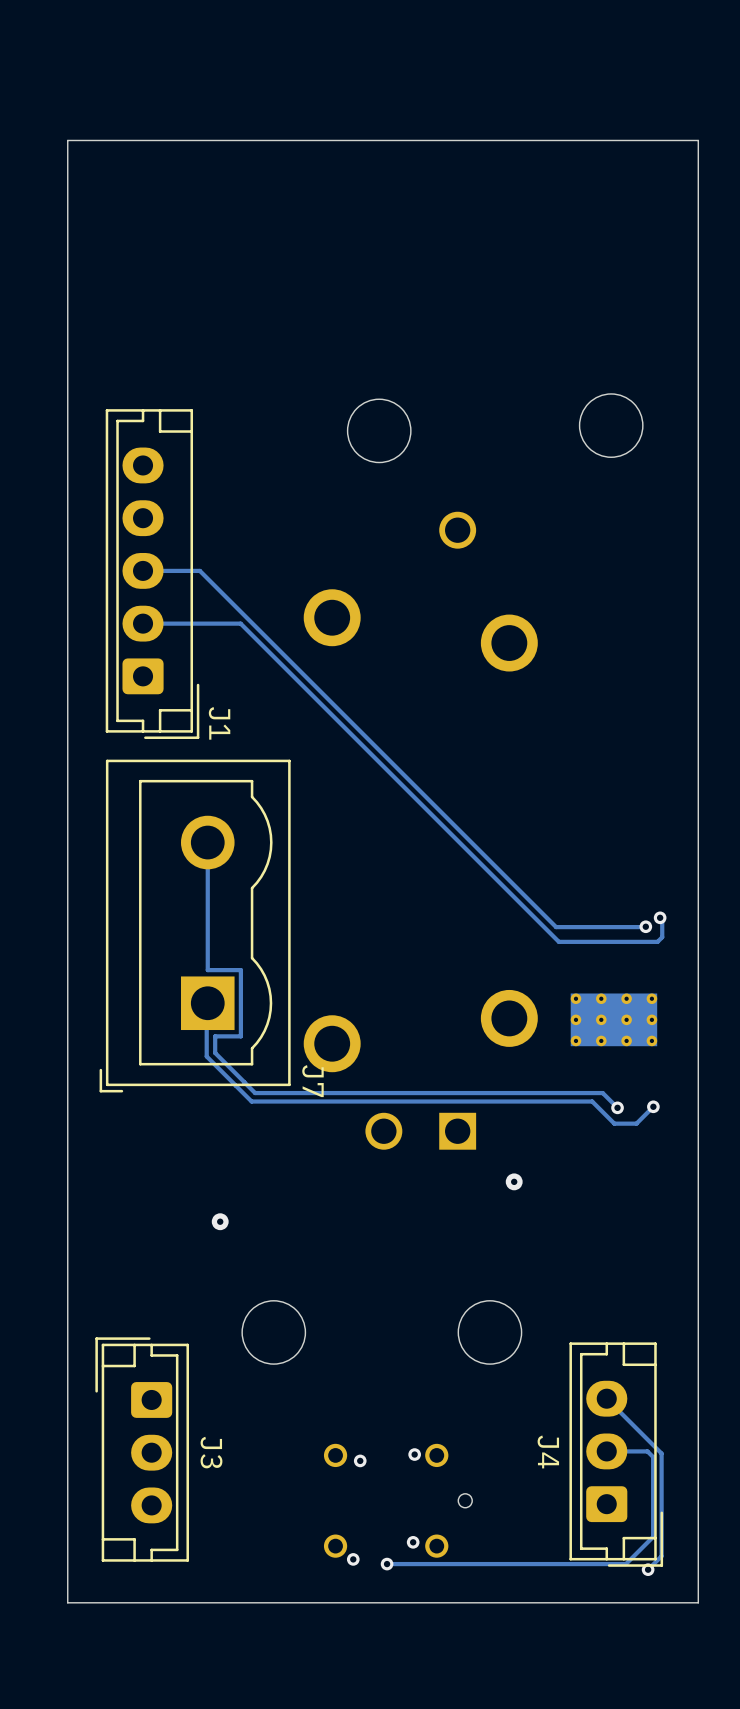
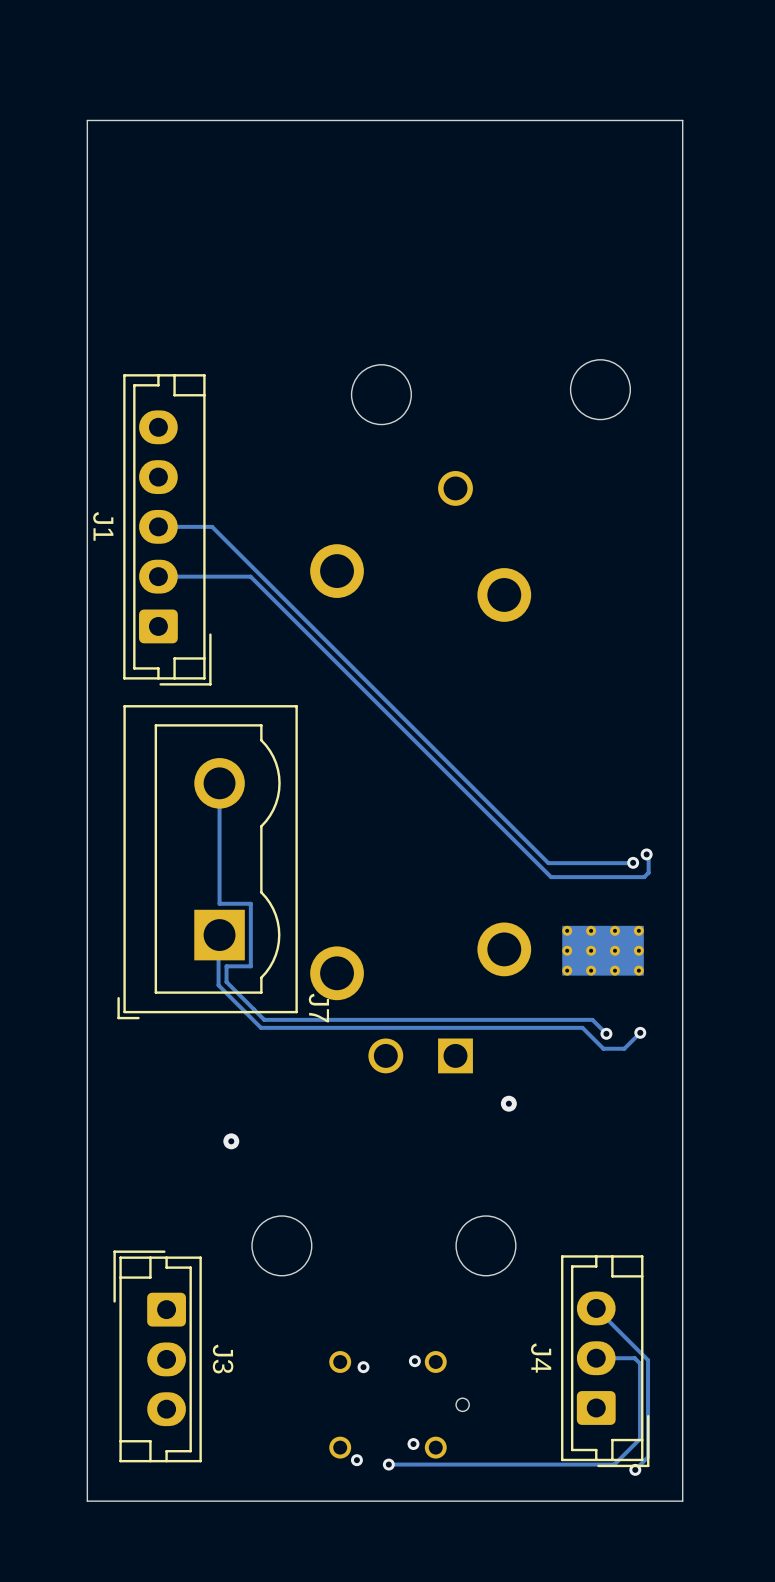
J1 name position: J1 (219, 723) -> J1 (103, 526)

